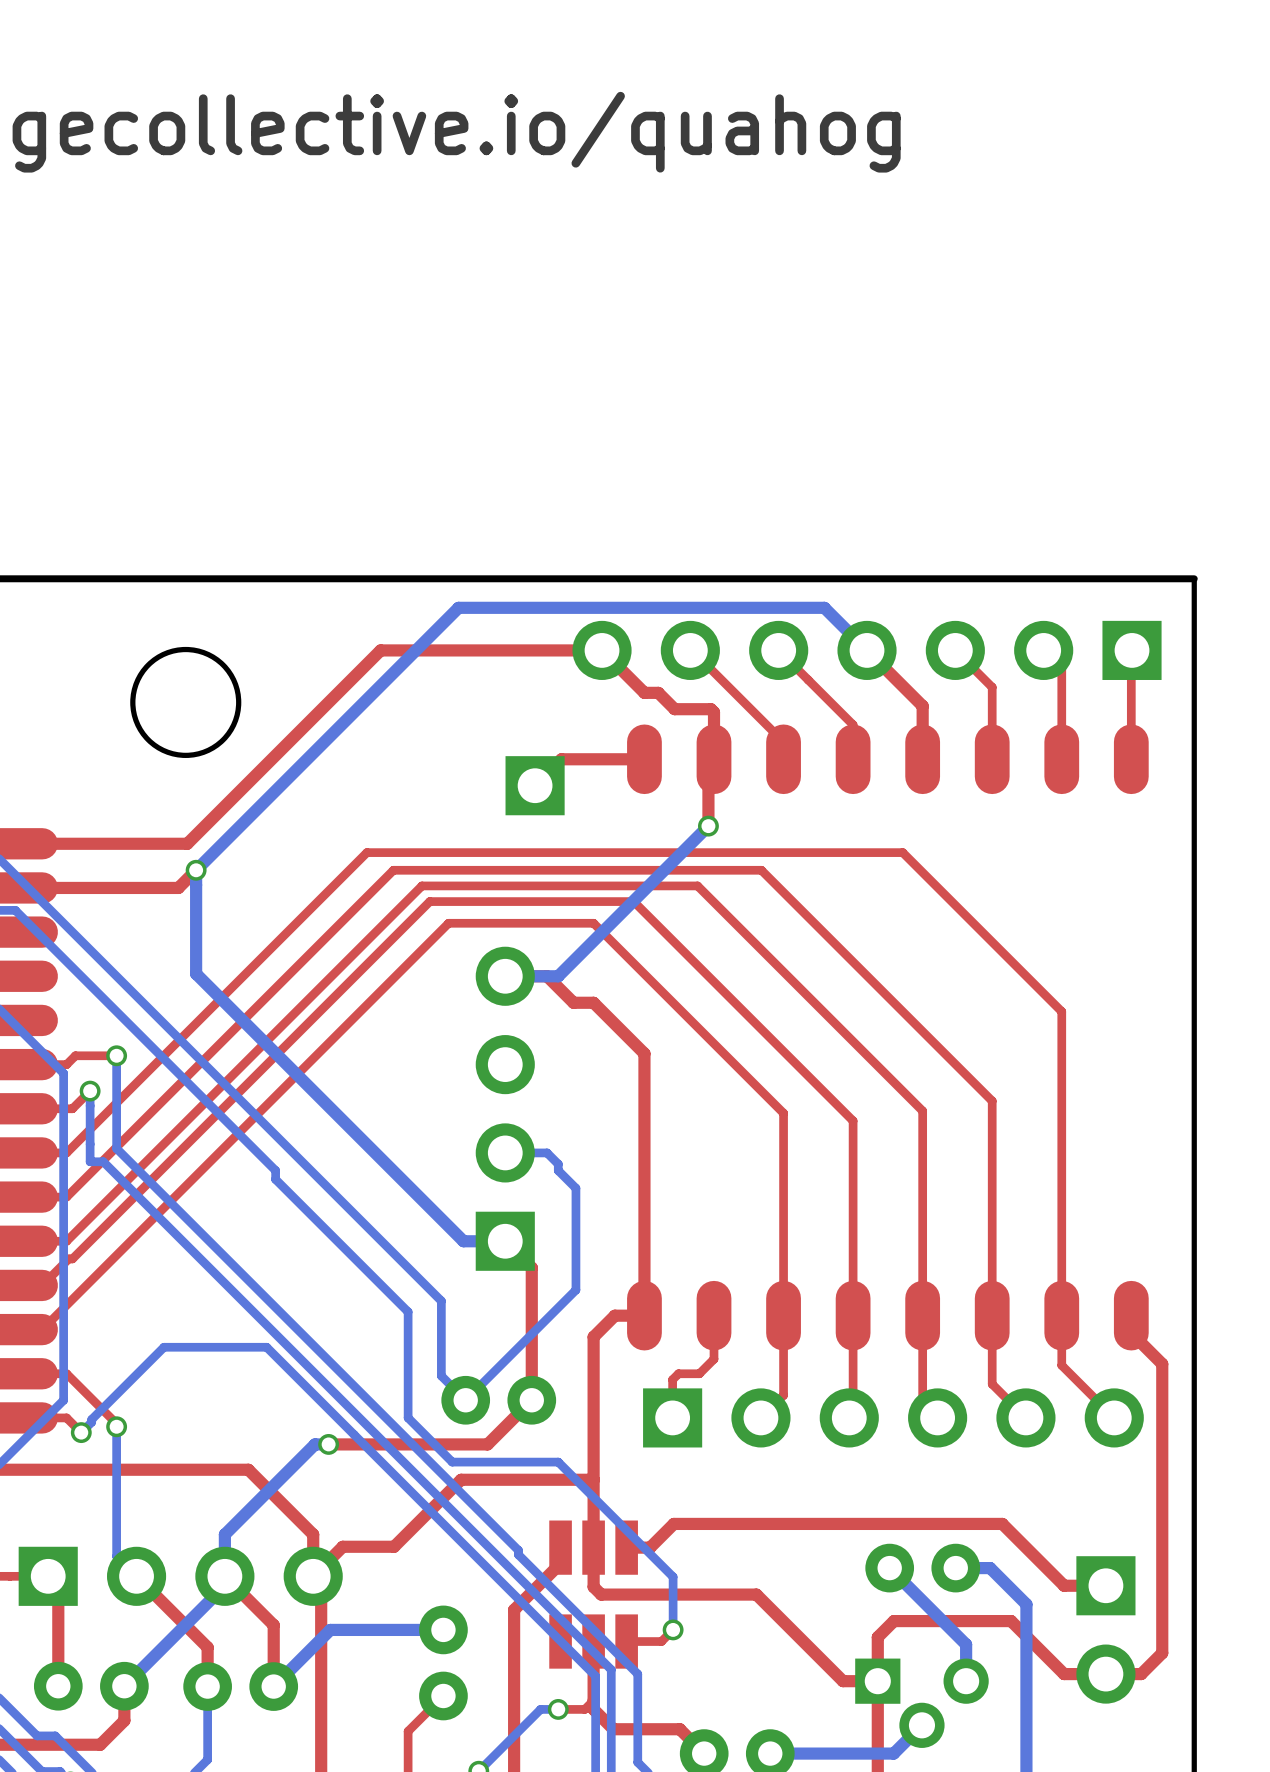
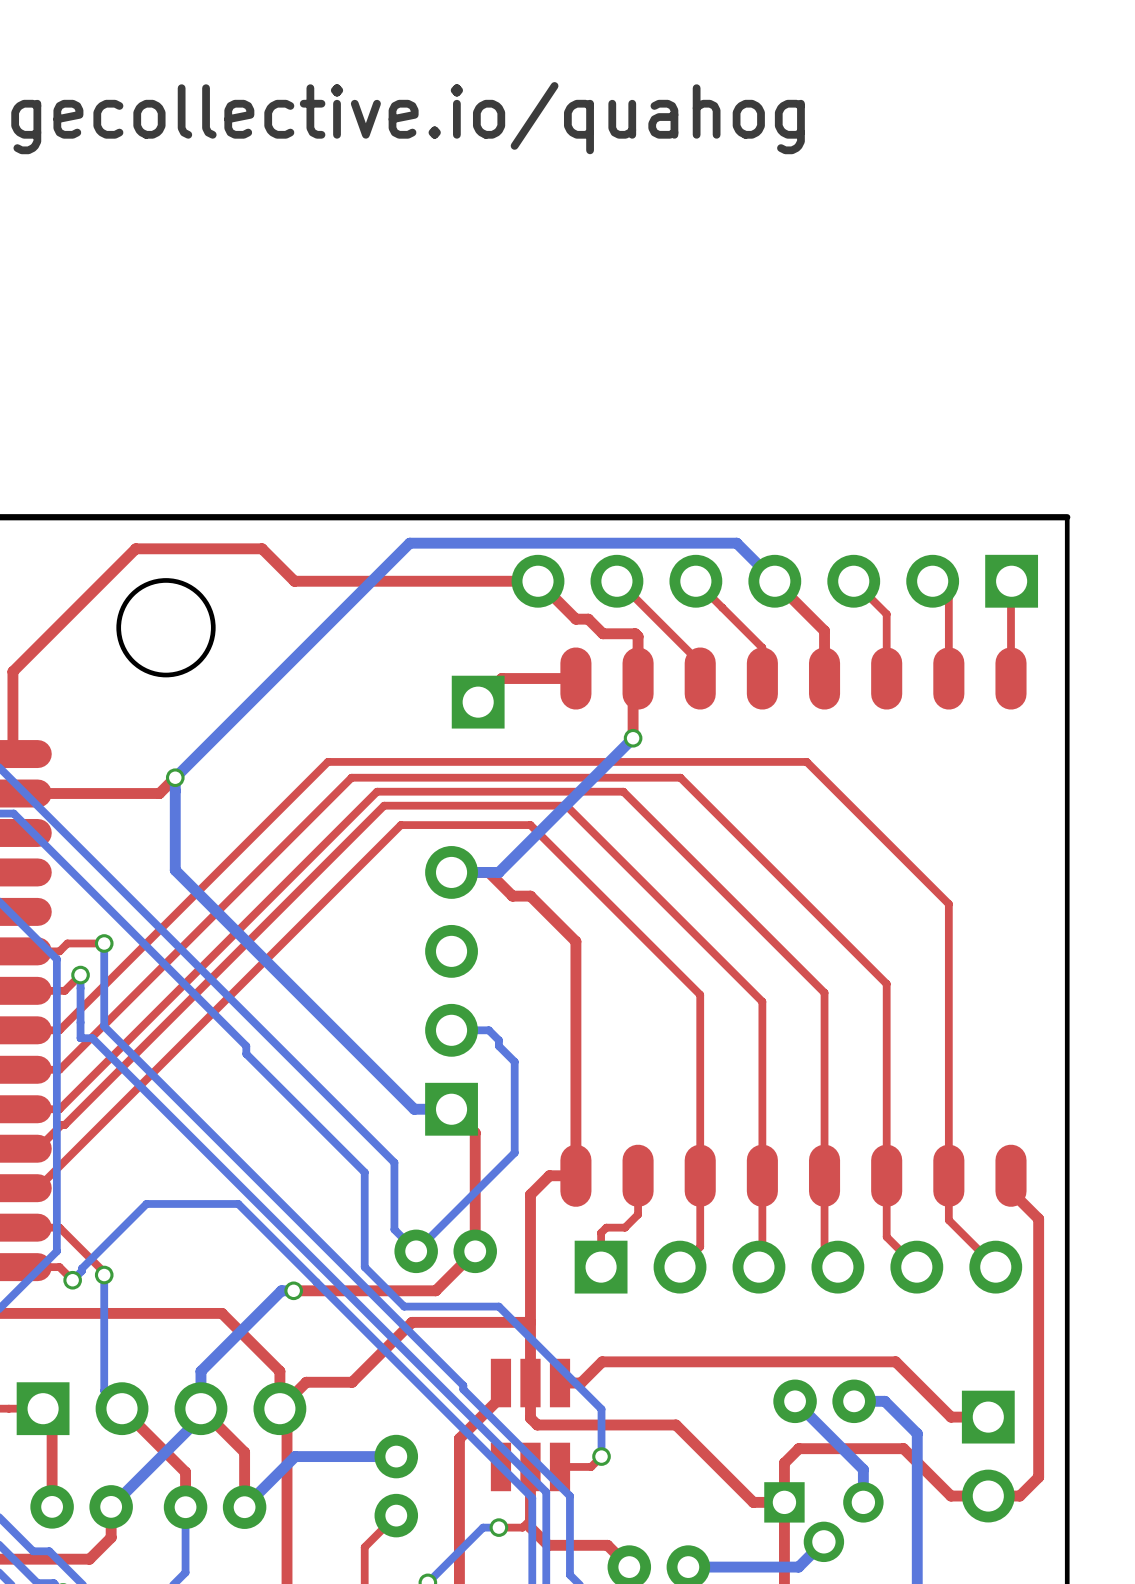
top track: (380, 650) (187, 843) (14, 843) -> (340, 581) (294, 581) (262, 548) (135, 548) (12, 671) (12, 754)

